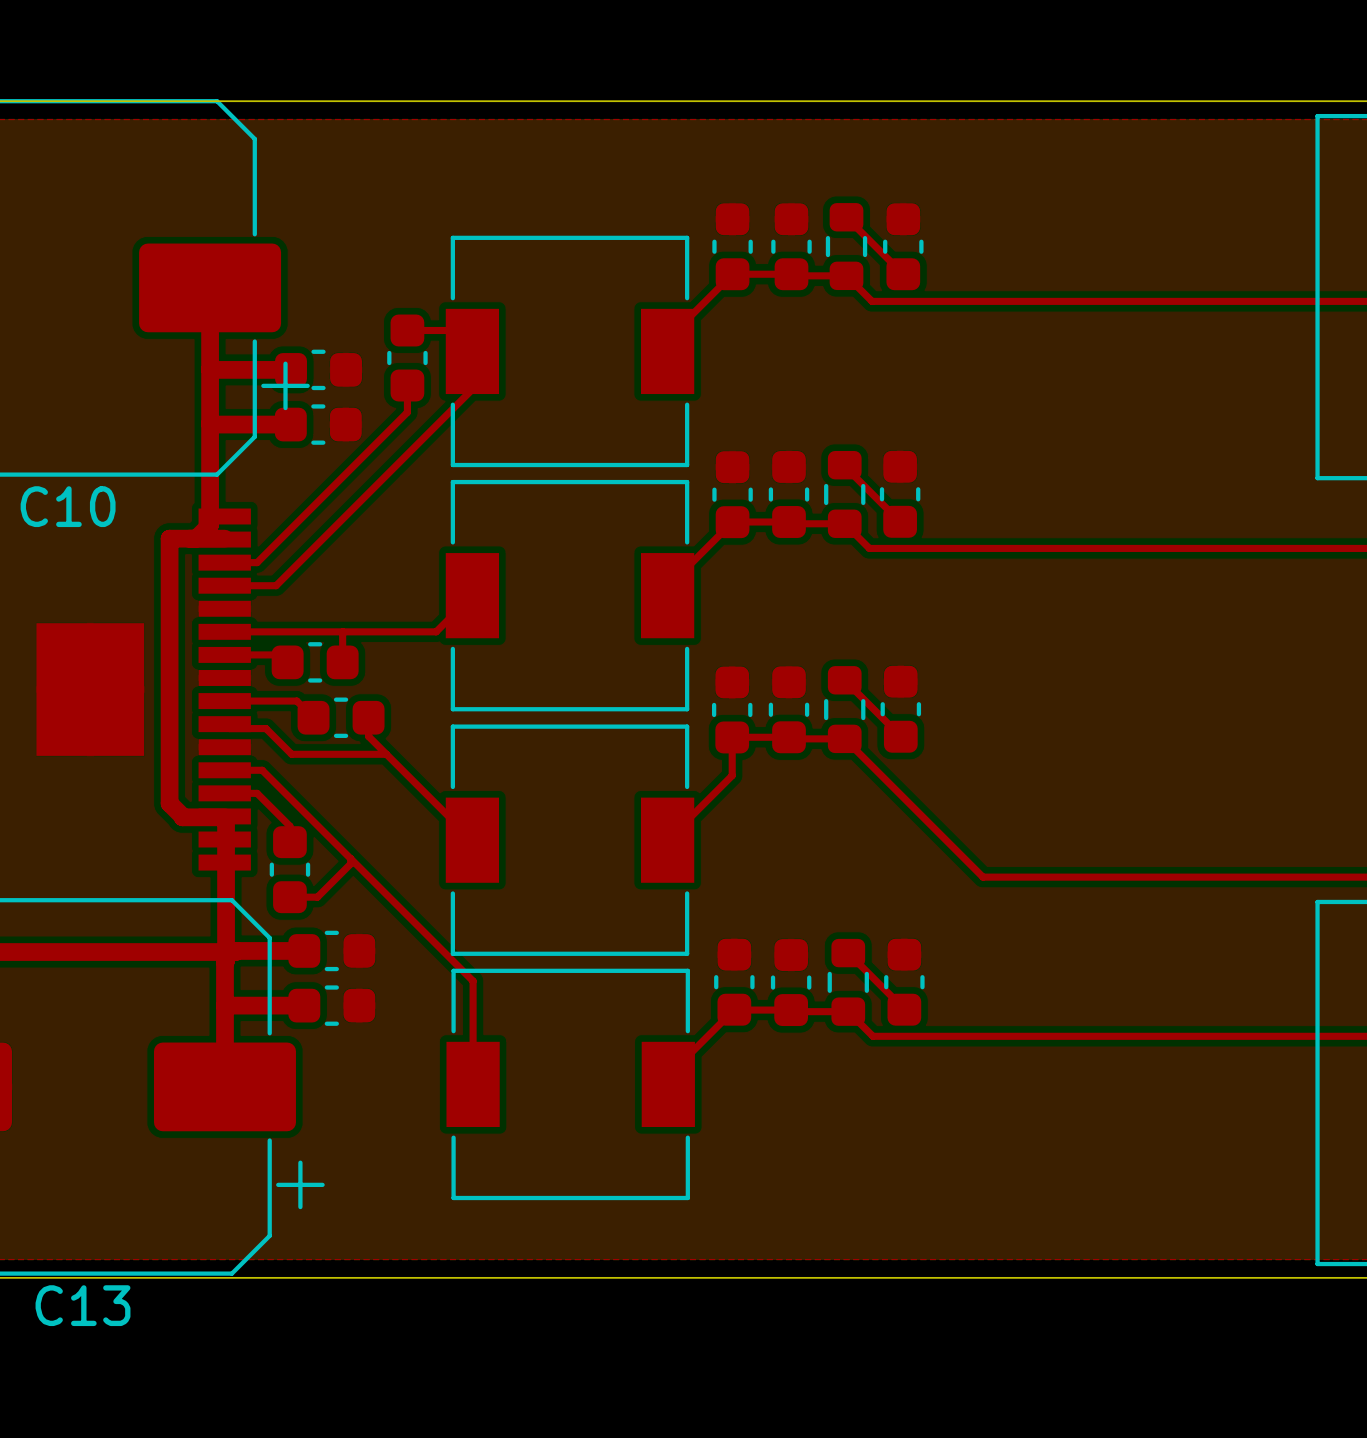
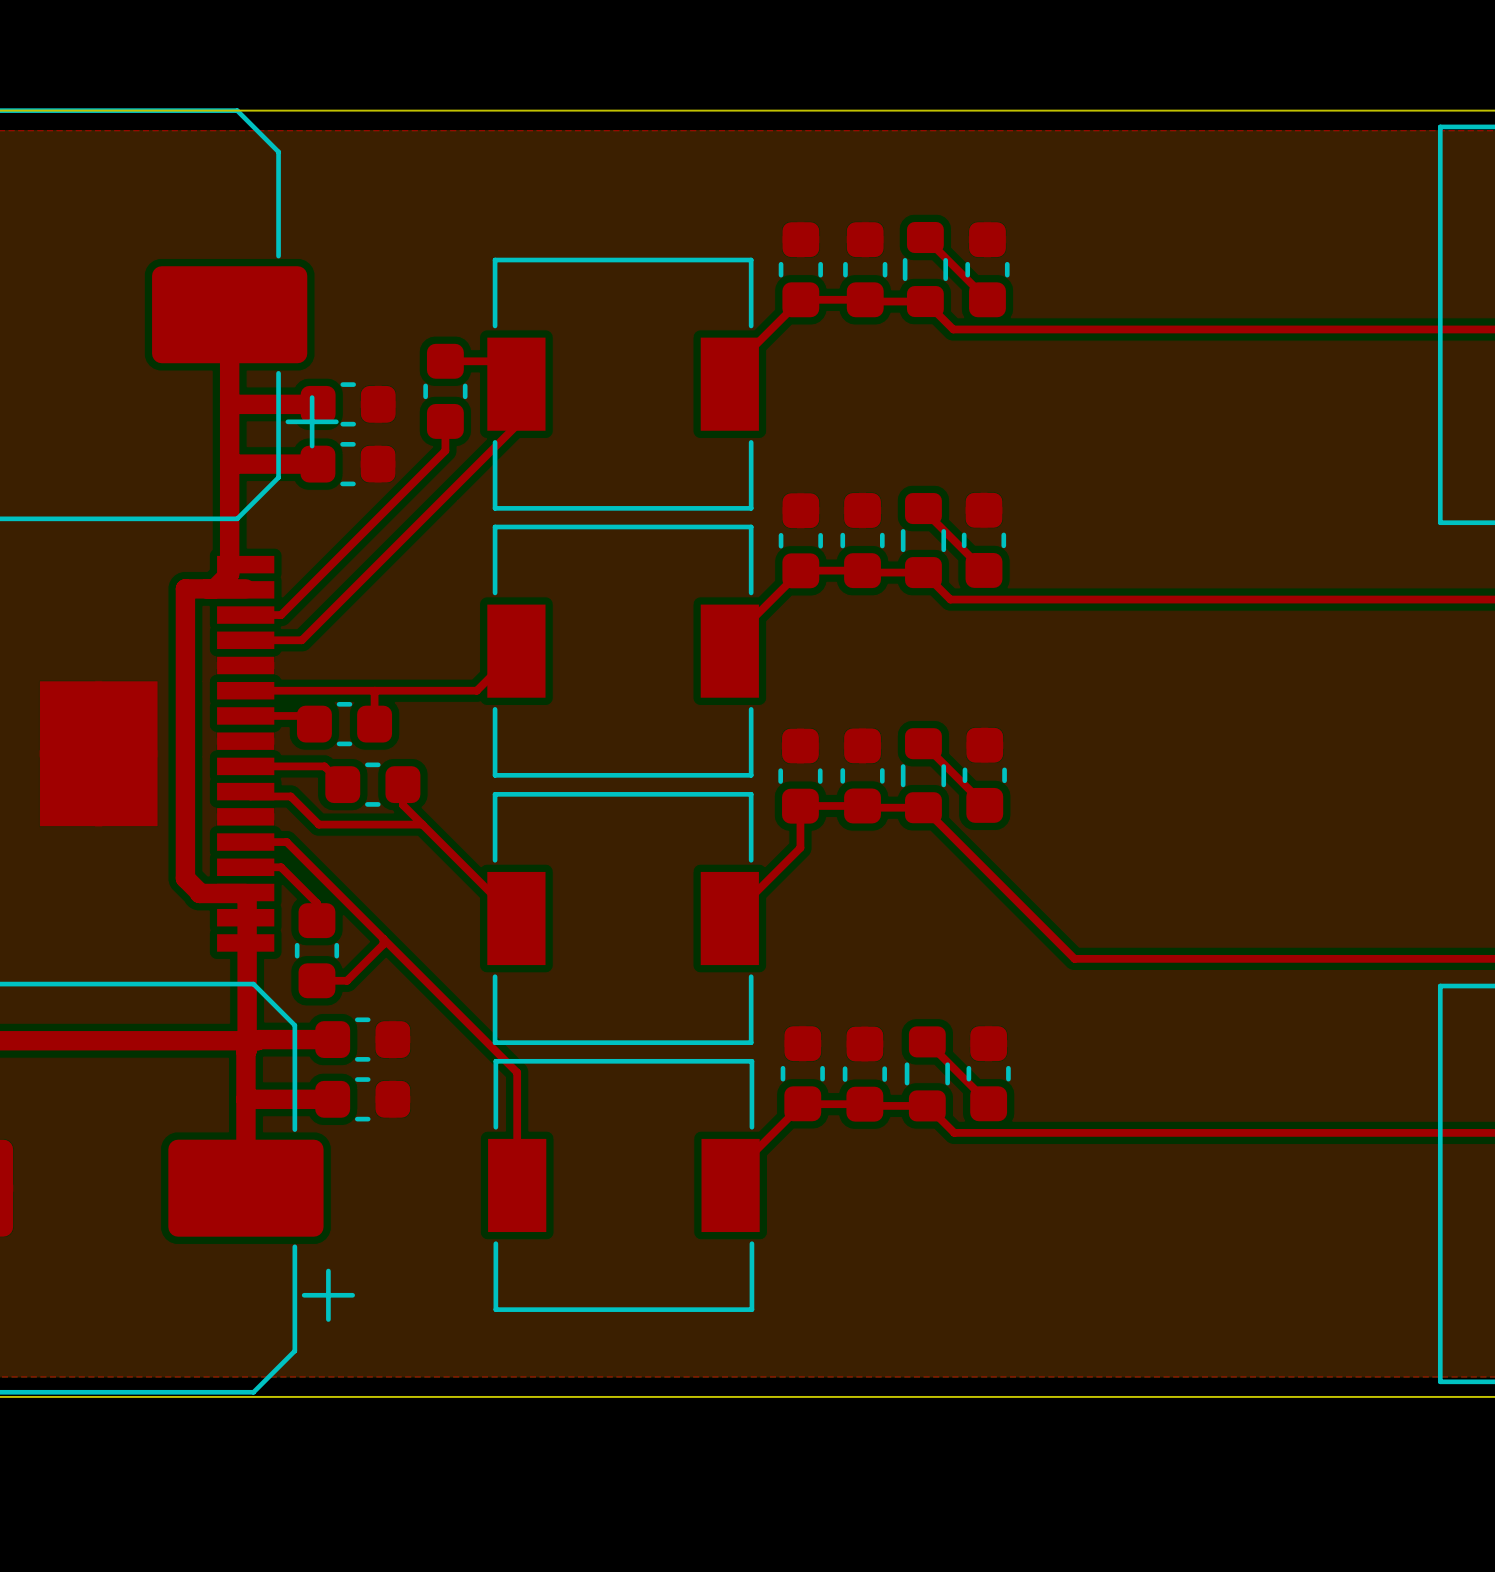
C10 name: C10 (68, 506) -> none
C13 name: C13 (83, 1305) -> none

